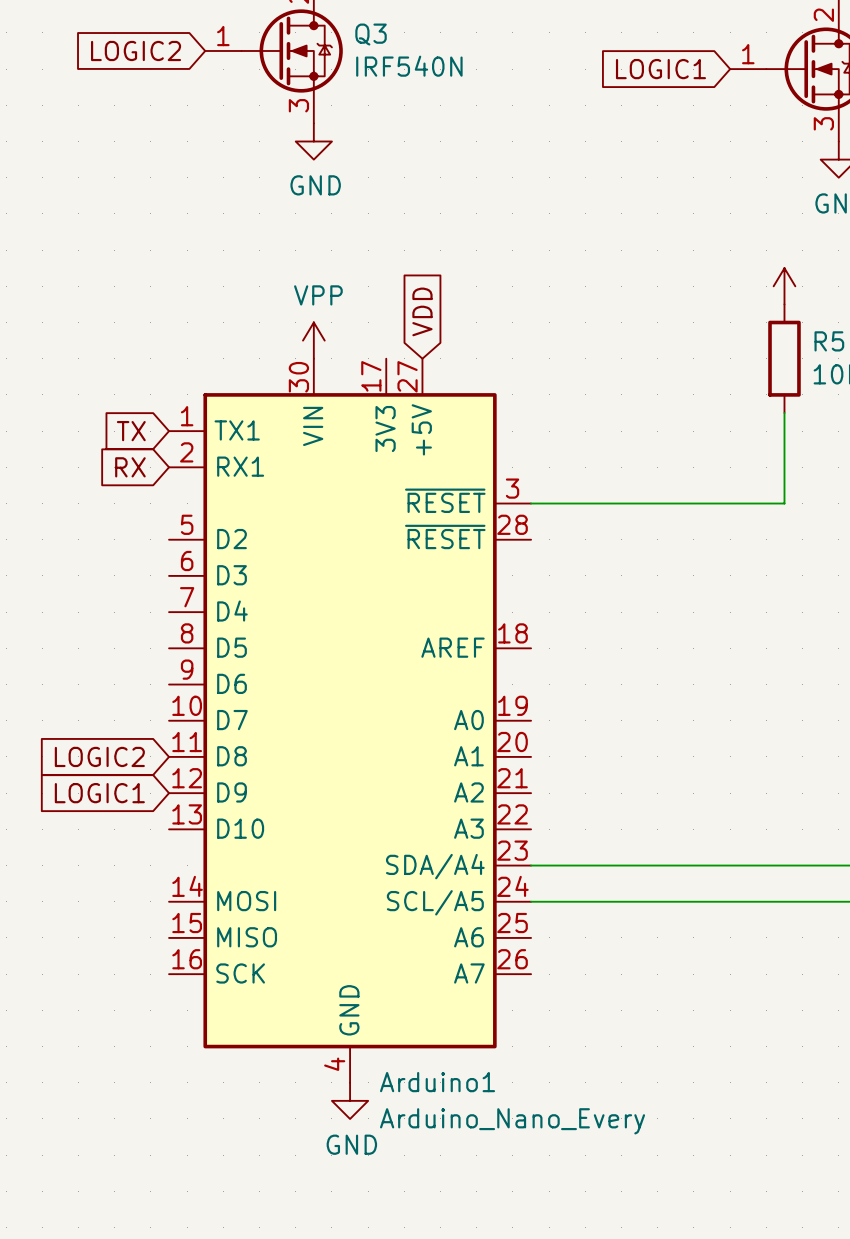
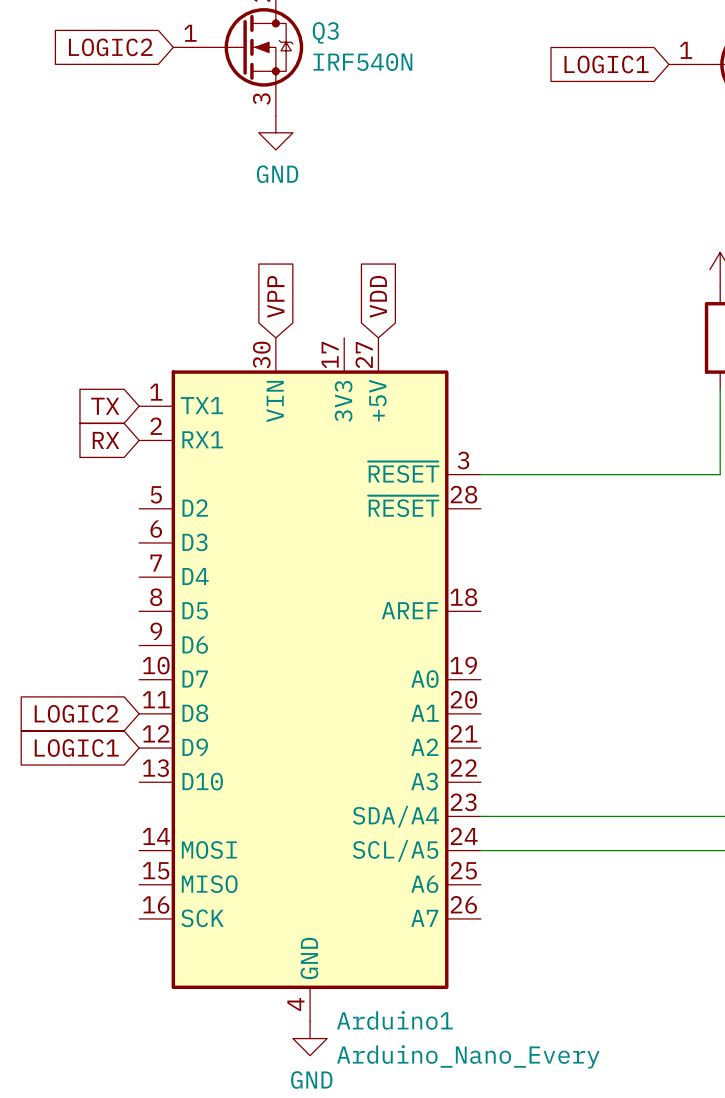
global label: none -> VPP (275, 296)
power symbol: VPP (313, 340) -> none

